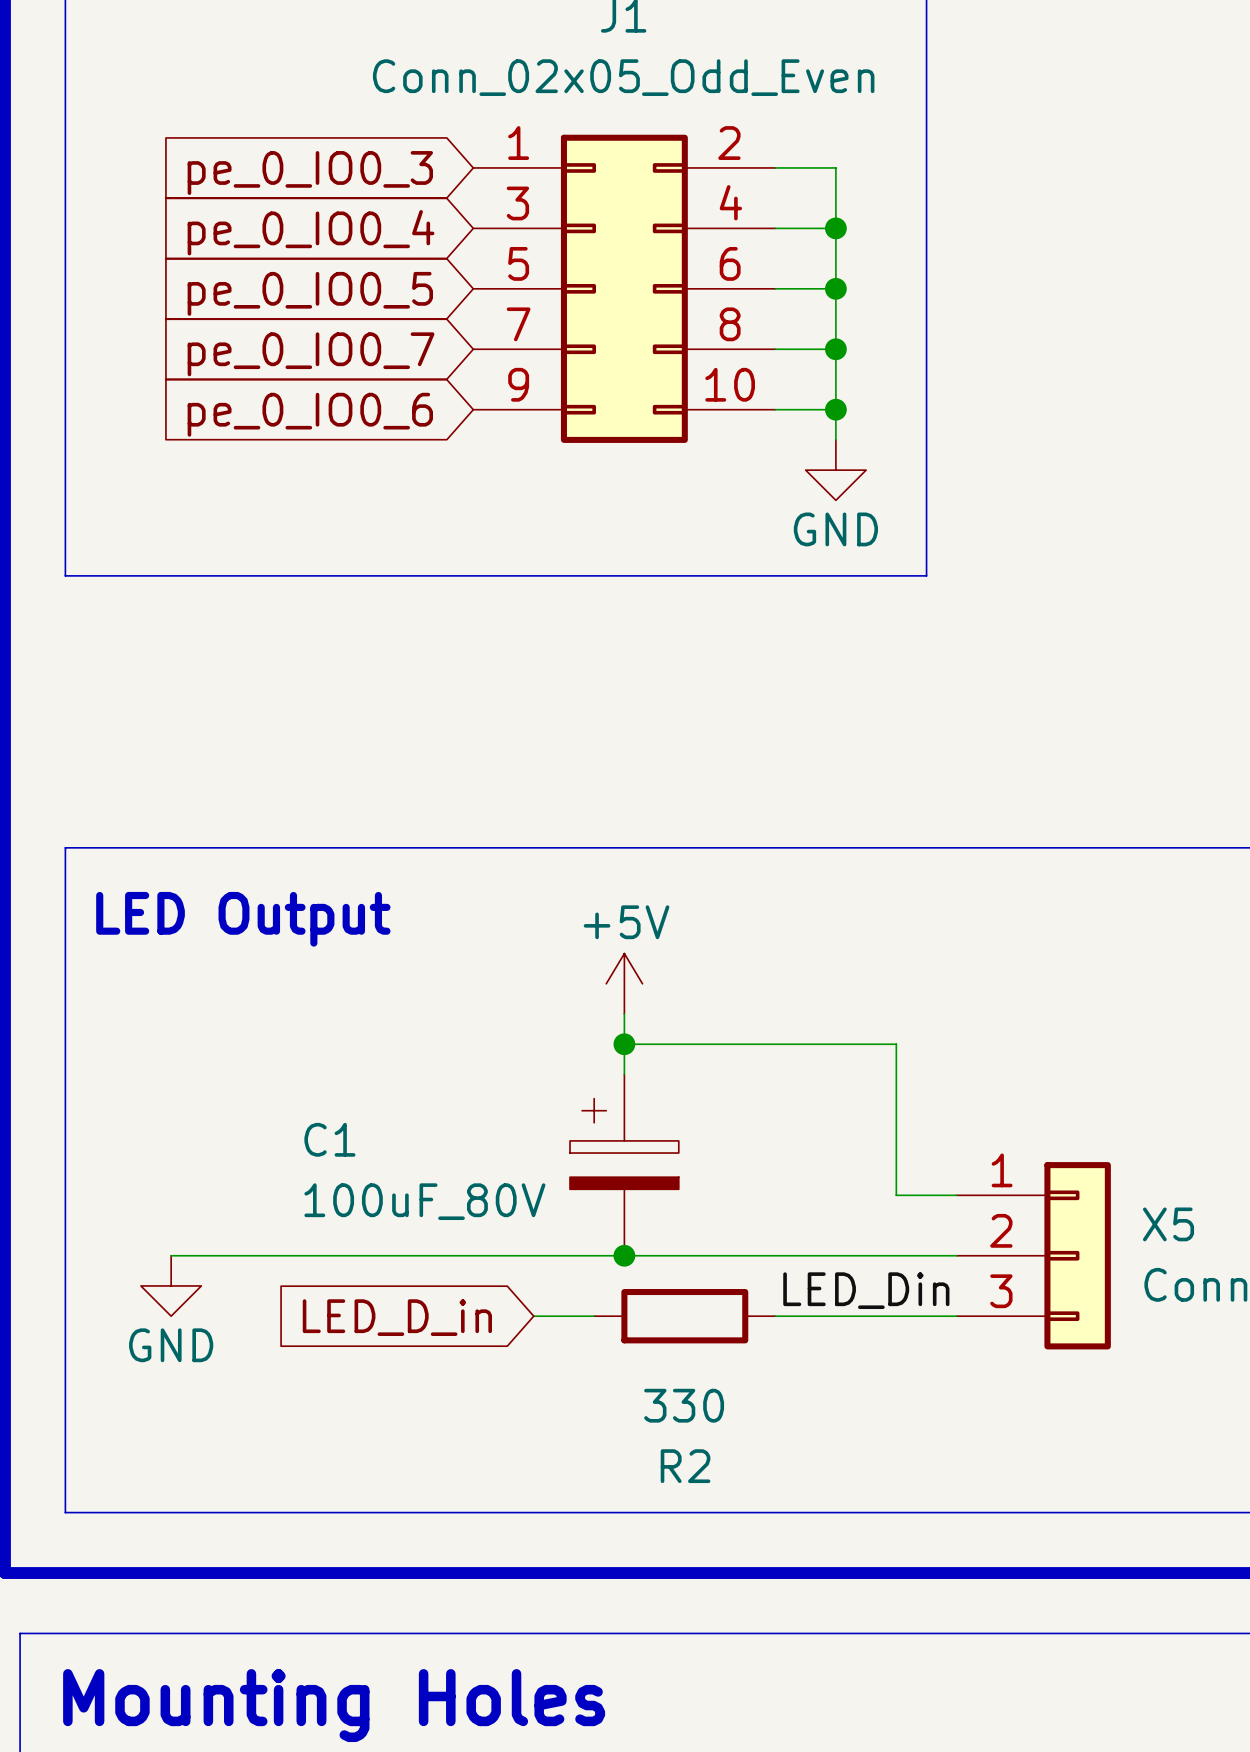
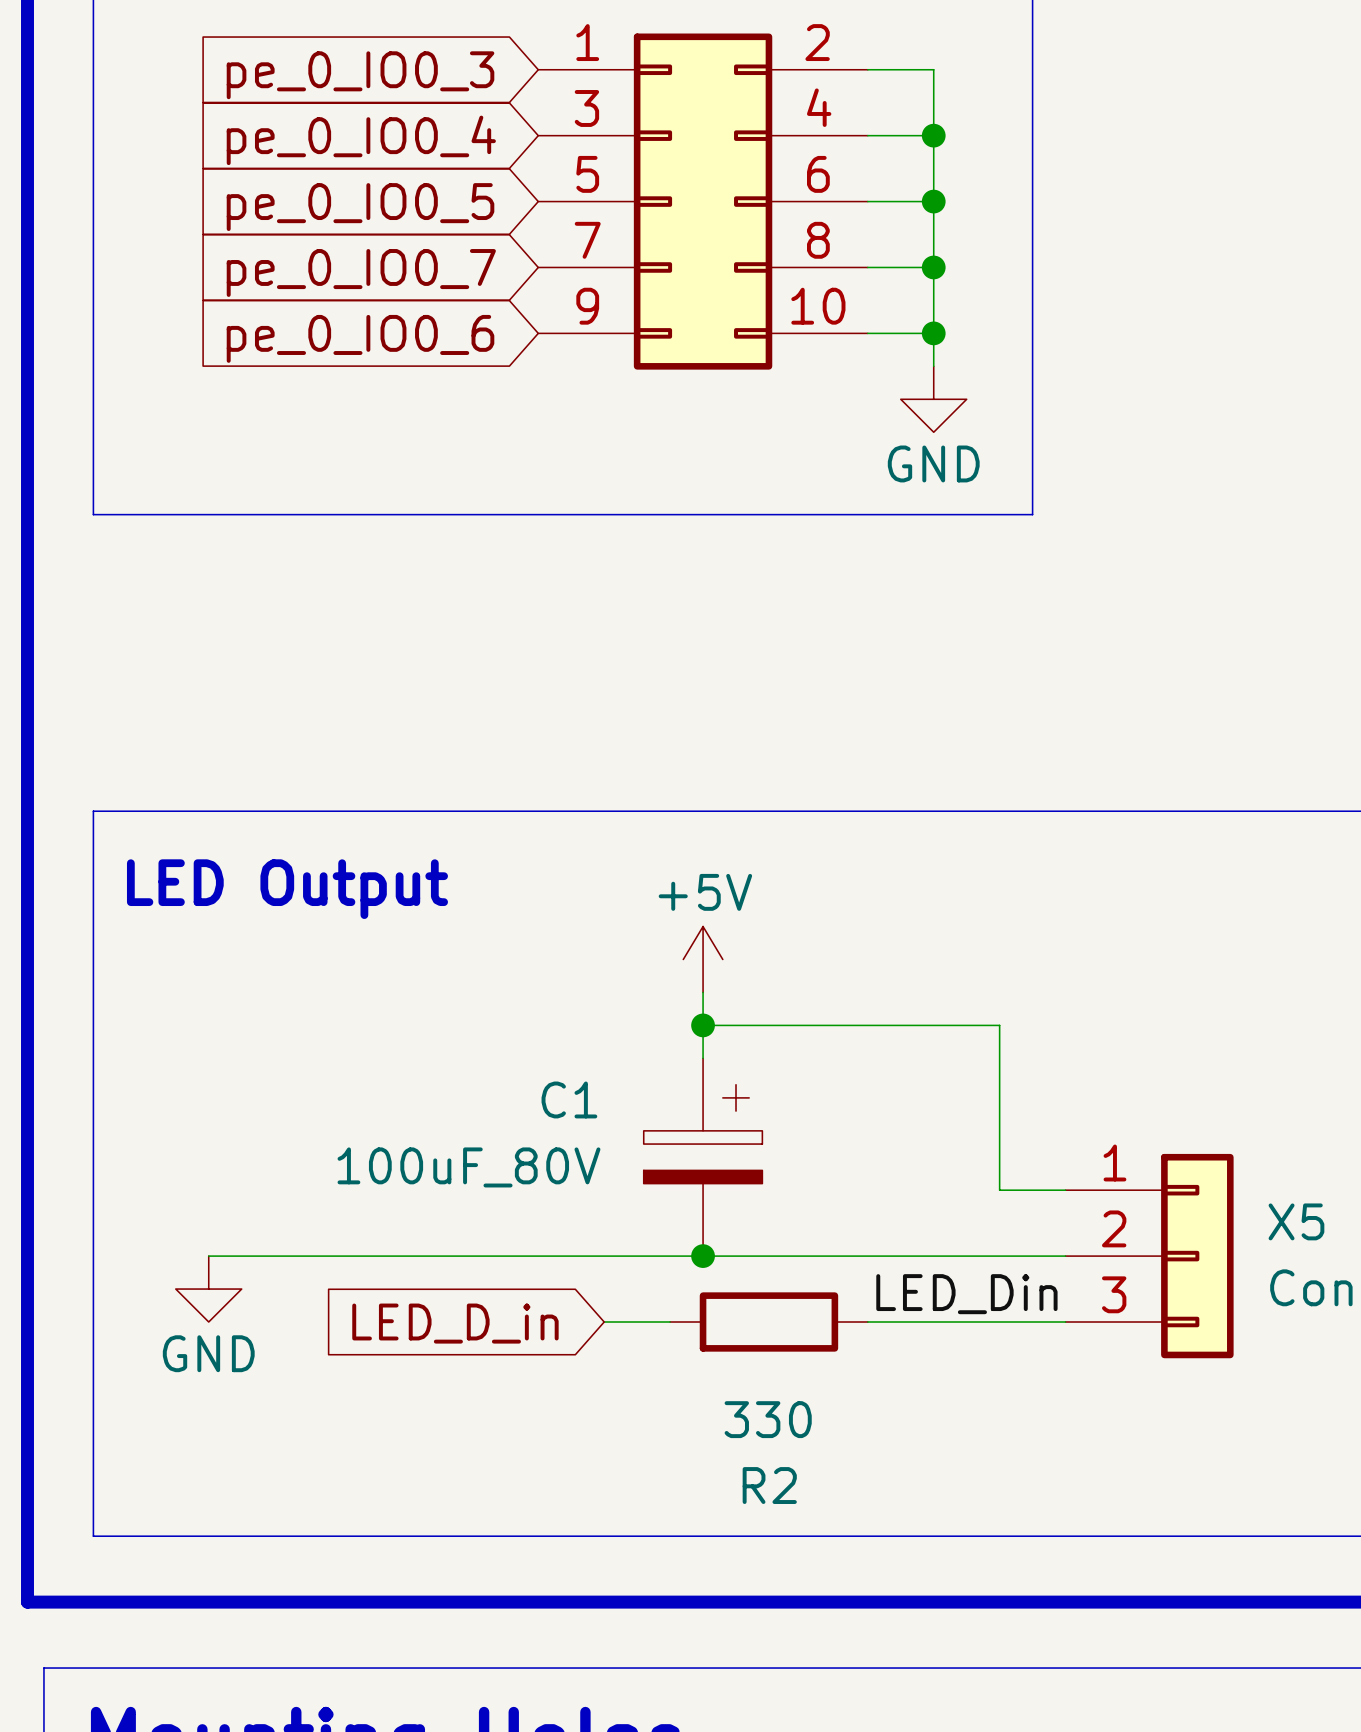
C1 name position: C1 (329, 1139) -> C1 (569, 1099)
C1 flip: as is (624, 1143) -> left-right (703, 1134)
C1 value position: 100uF_80V (424, 1201) -> 100uF_80V (468, 1167)

